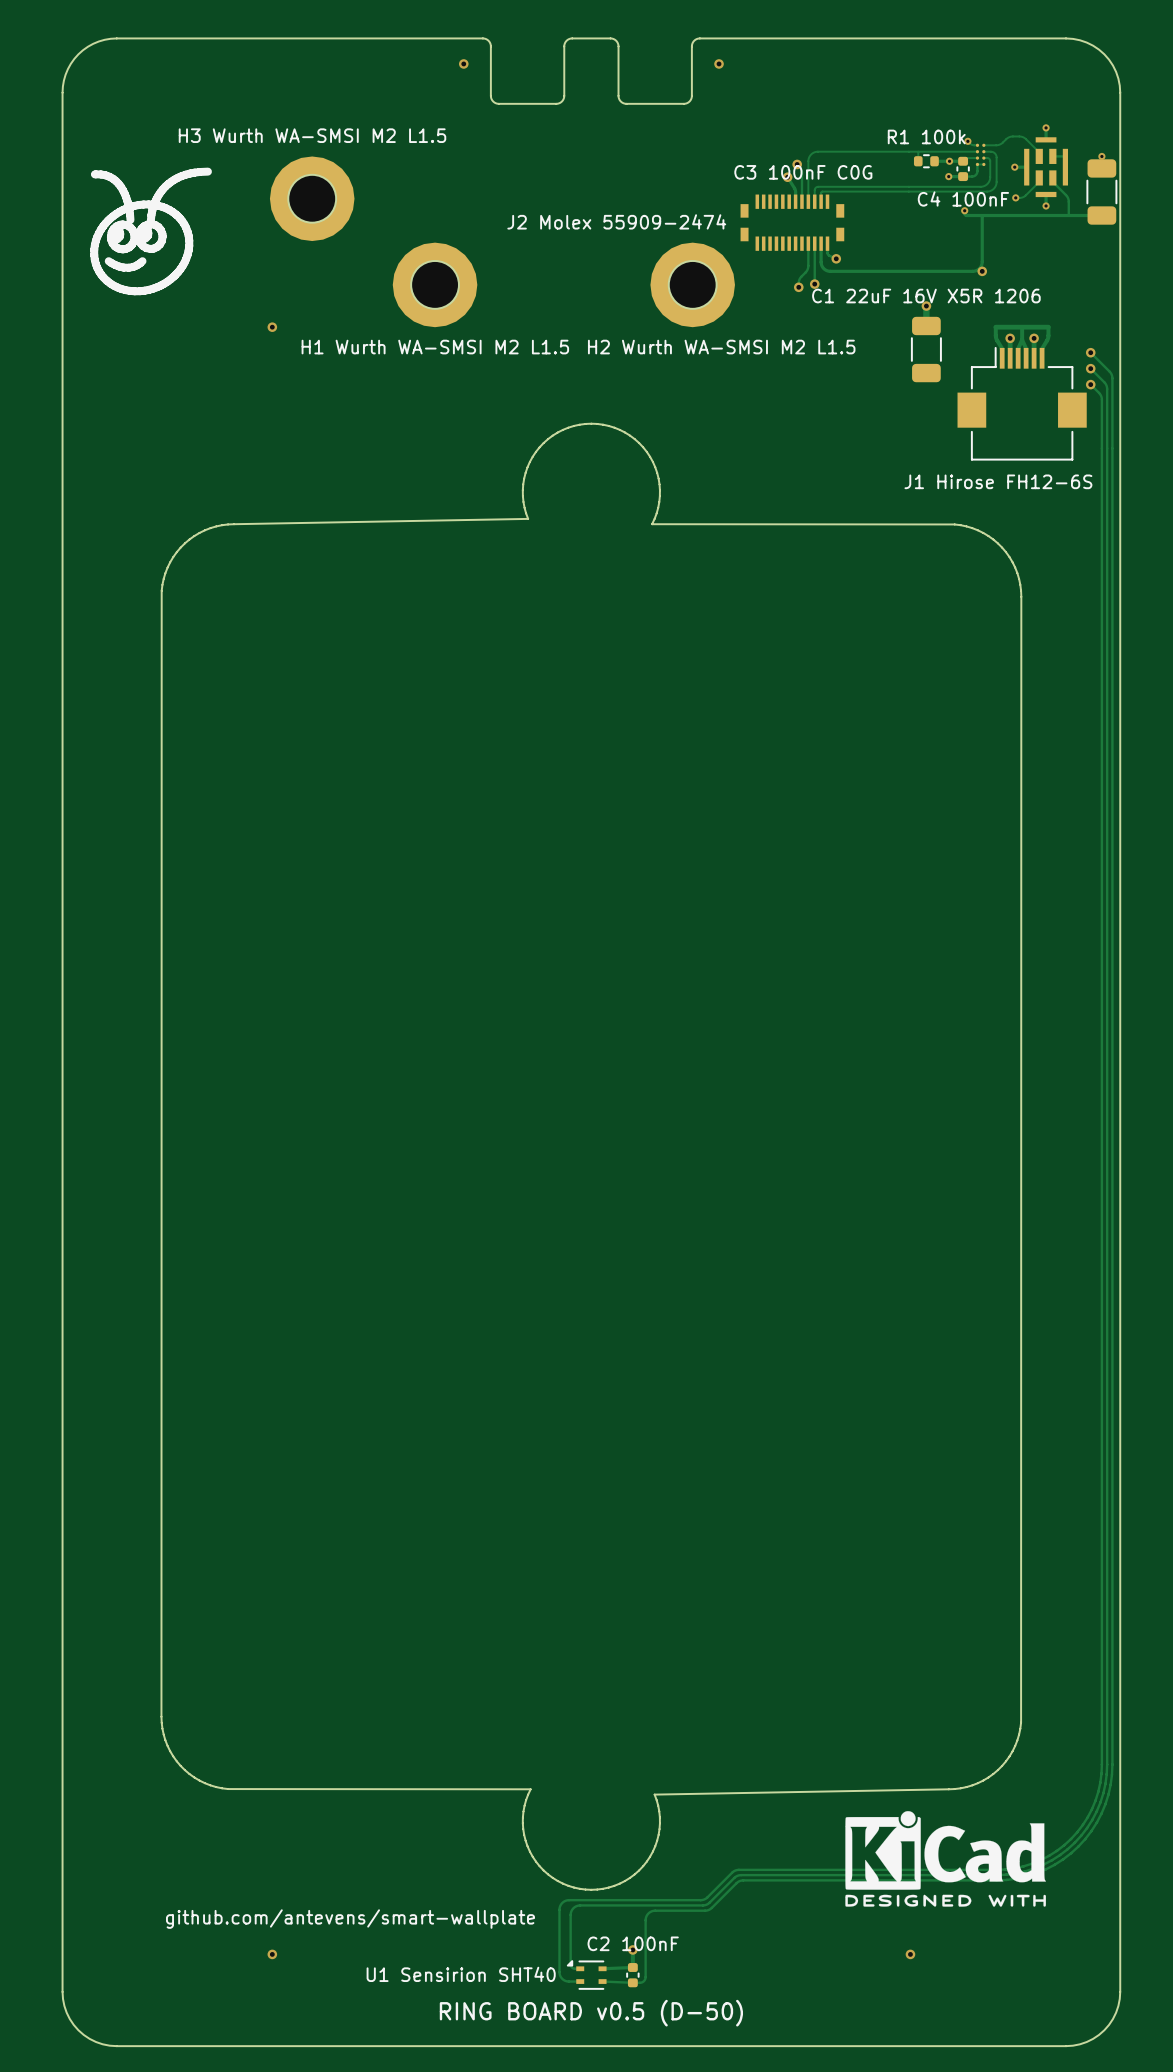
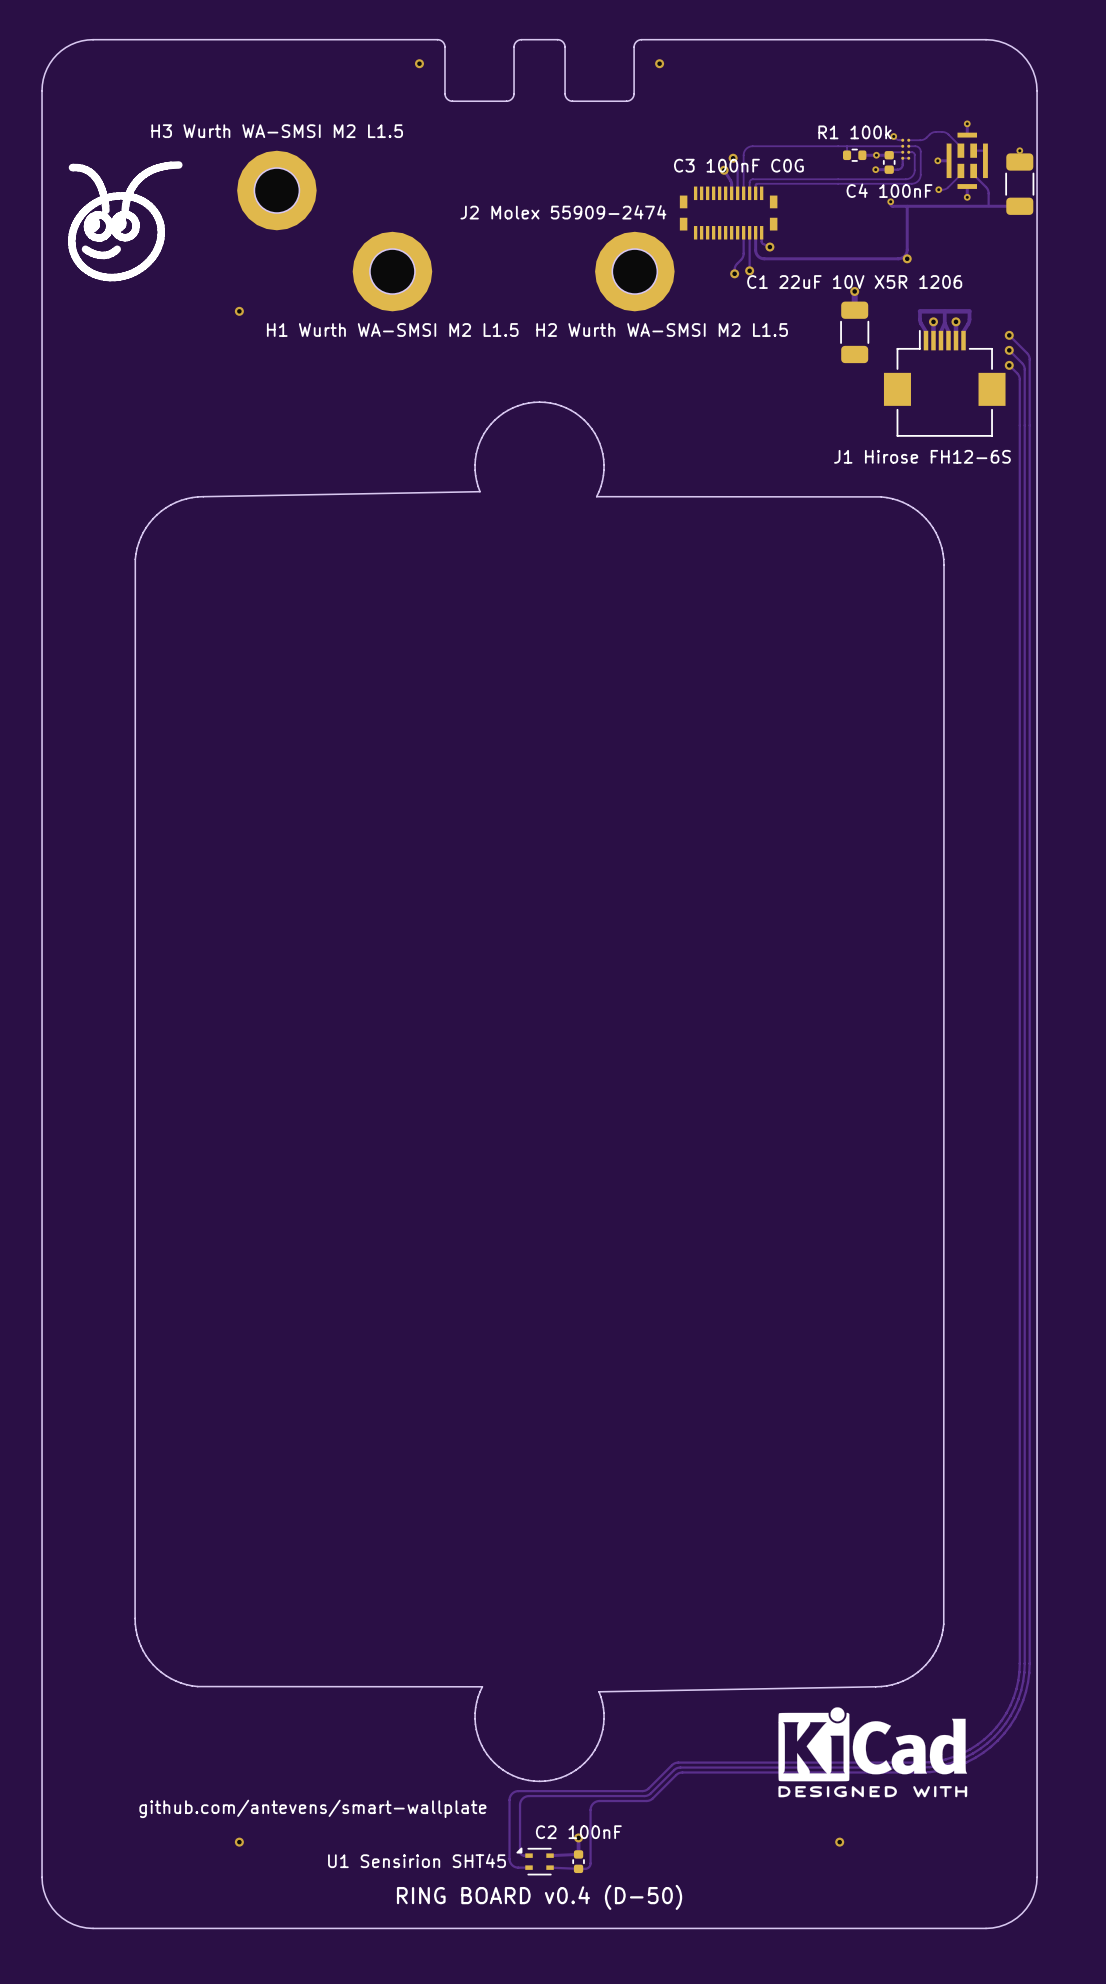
text: C1 22uF 16V X5R 1206 (926, 296) -> C1 22uF 10V X5R 1206 (854, 282)
text: U1 Sensirion SHT40 (461, 1974) -> U1 Sensirion SHT45 (417, 1860)
text: RING BOARD v0.5 (D-50) (591, 2013) -> RING BOARD v0.4 (D-50) (539, 1897)

